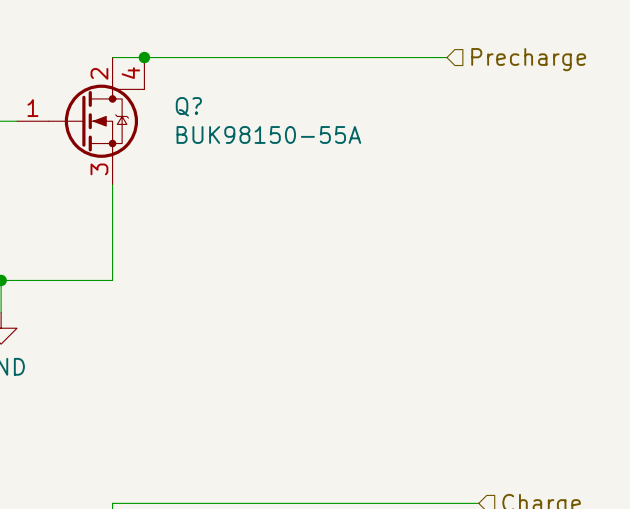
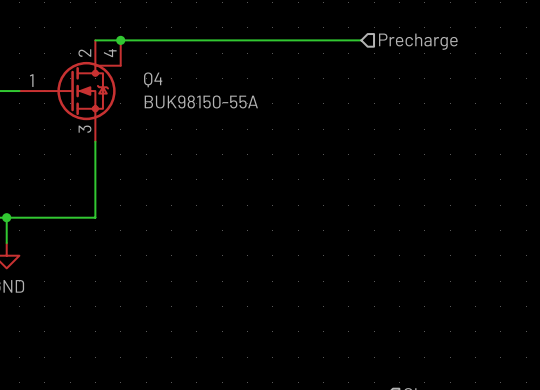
Q? name: Q? (188, 106) -> Q4 (153, 79)

